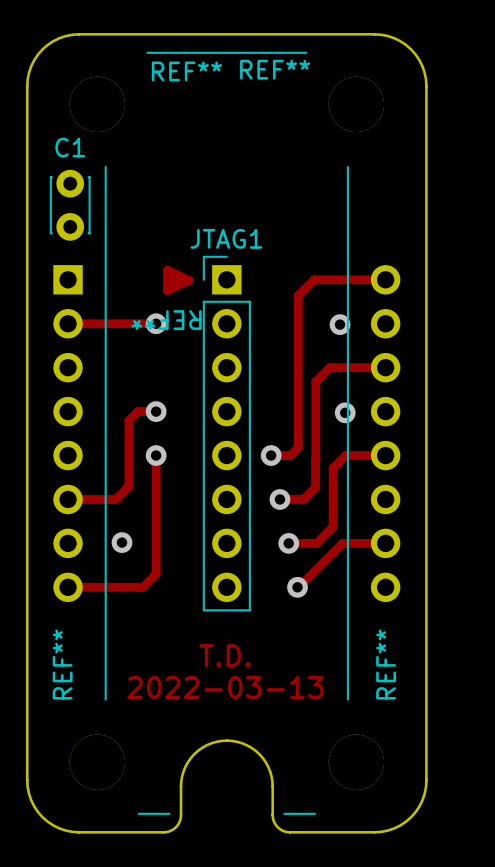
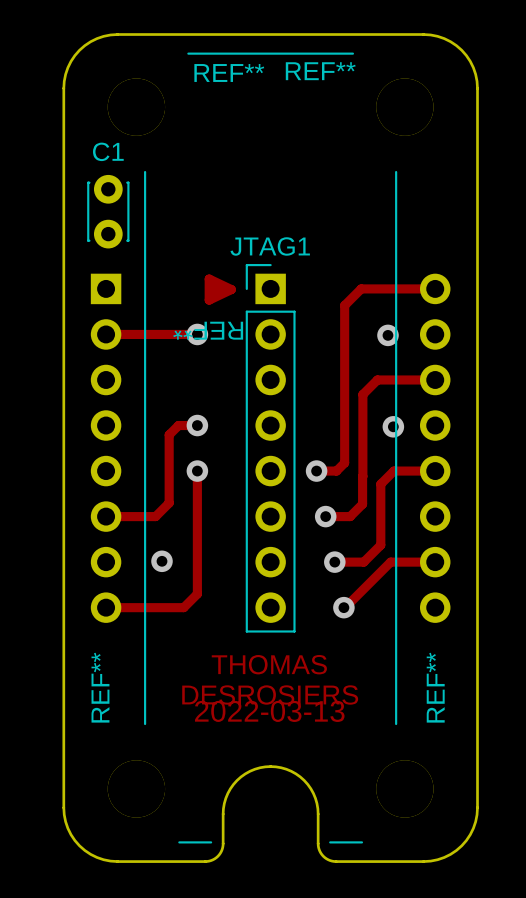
text: none -> THOMAS (269, 664)
text: T.D. (224, 655) -> none
text: none -> DESROSIERS (270, 694)

